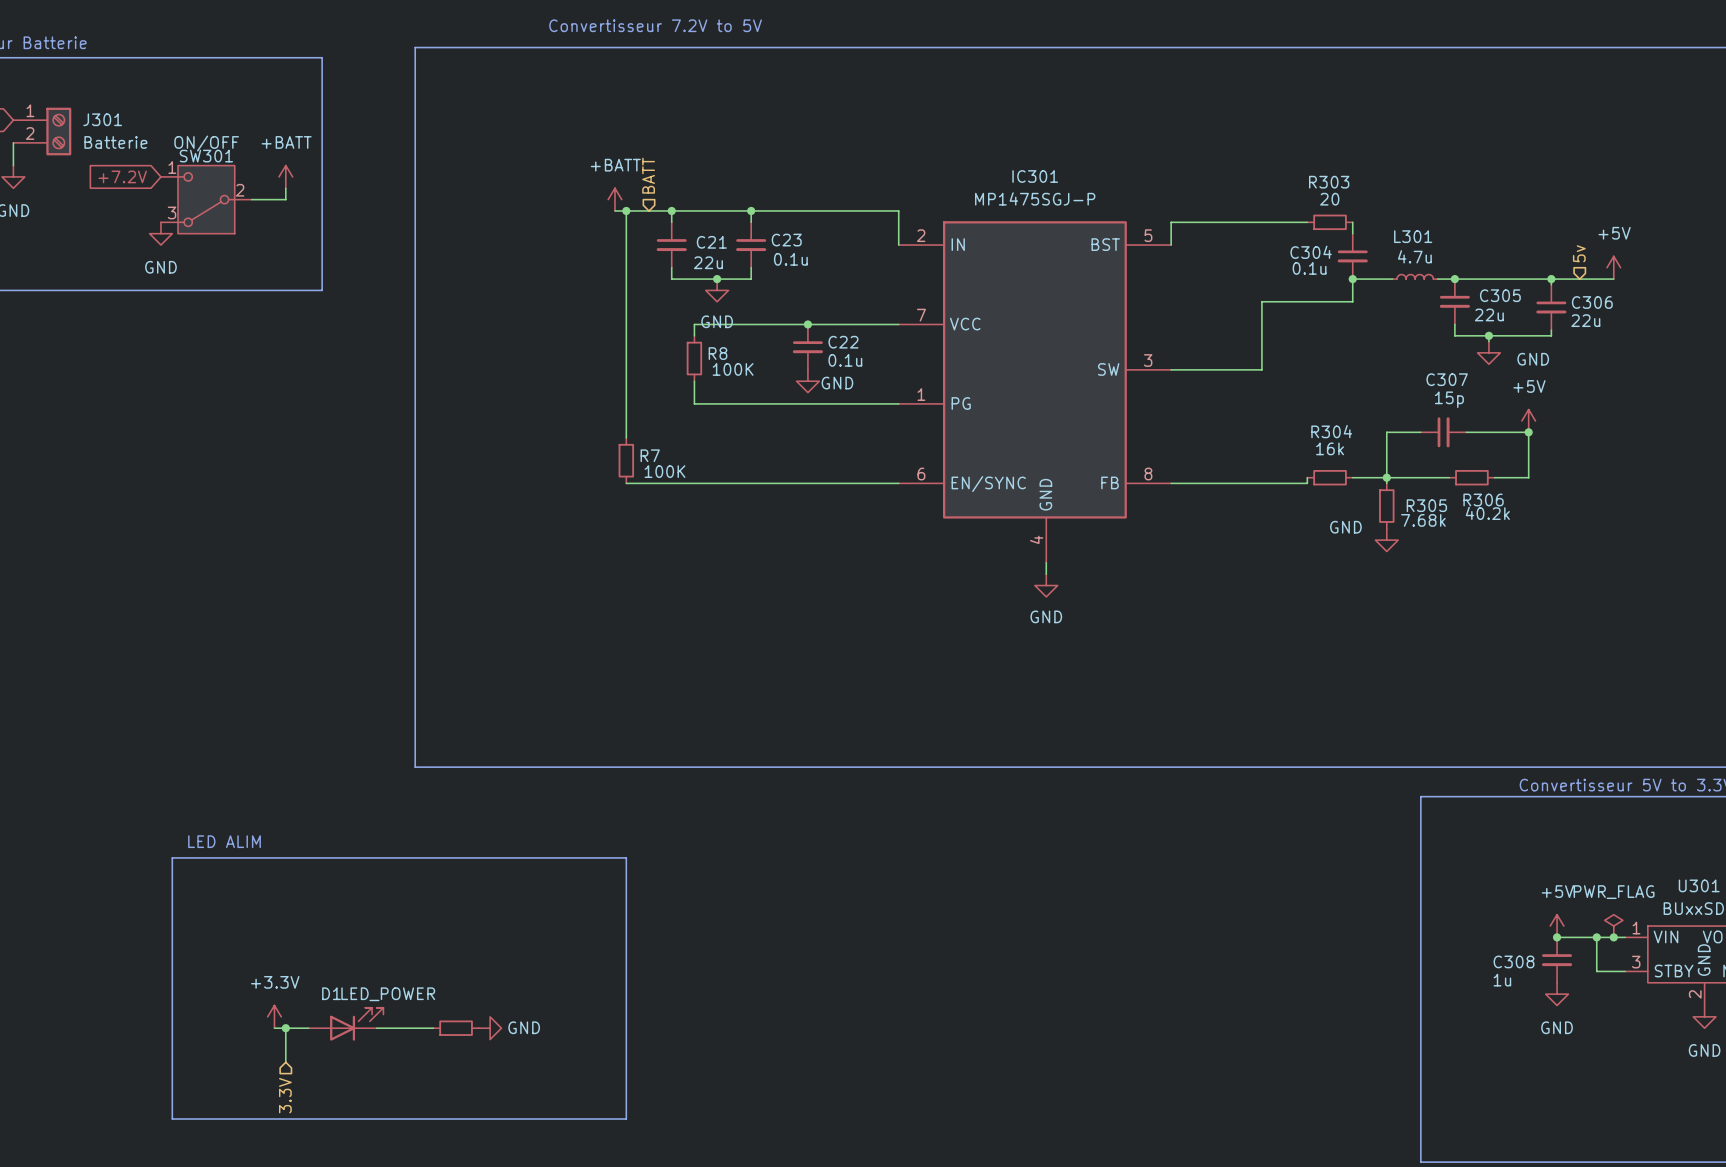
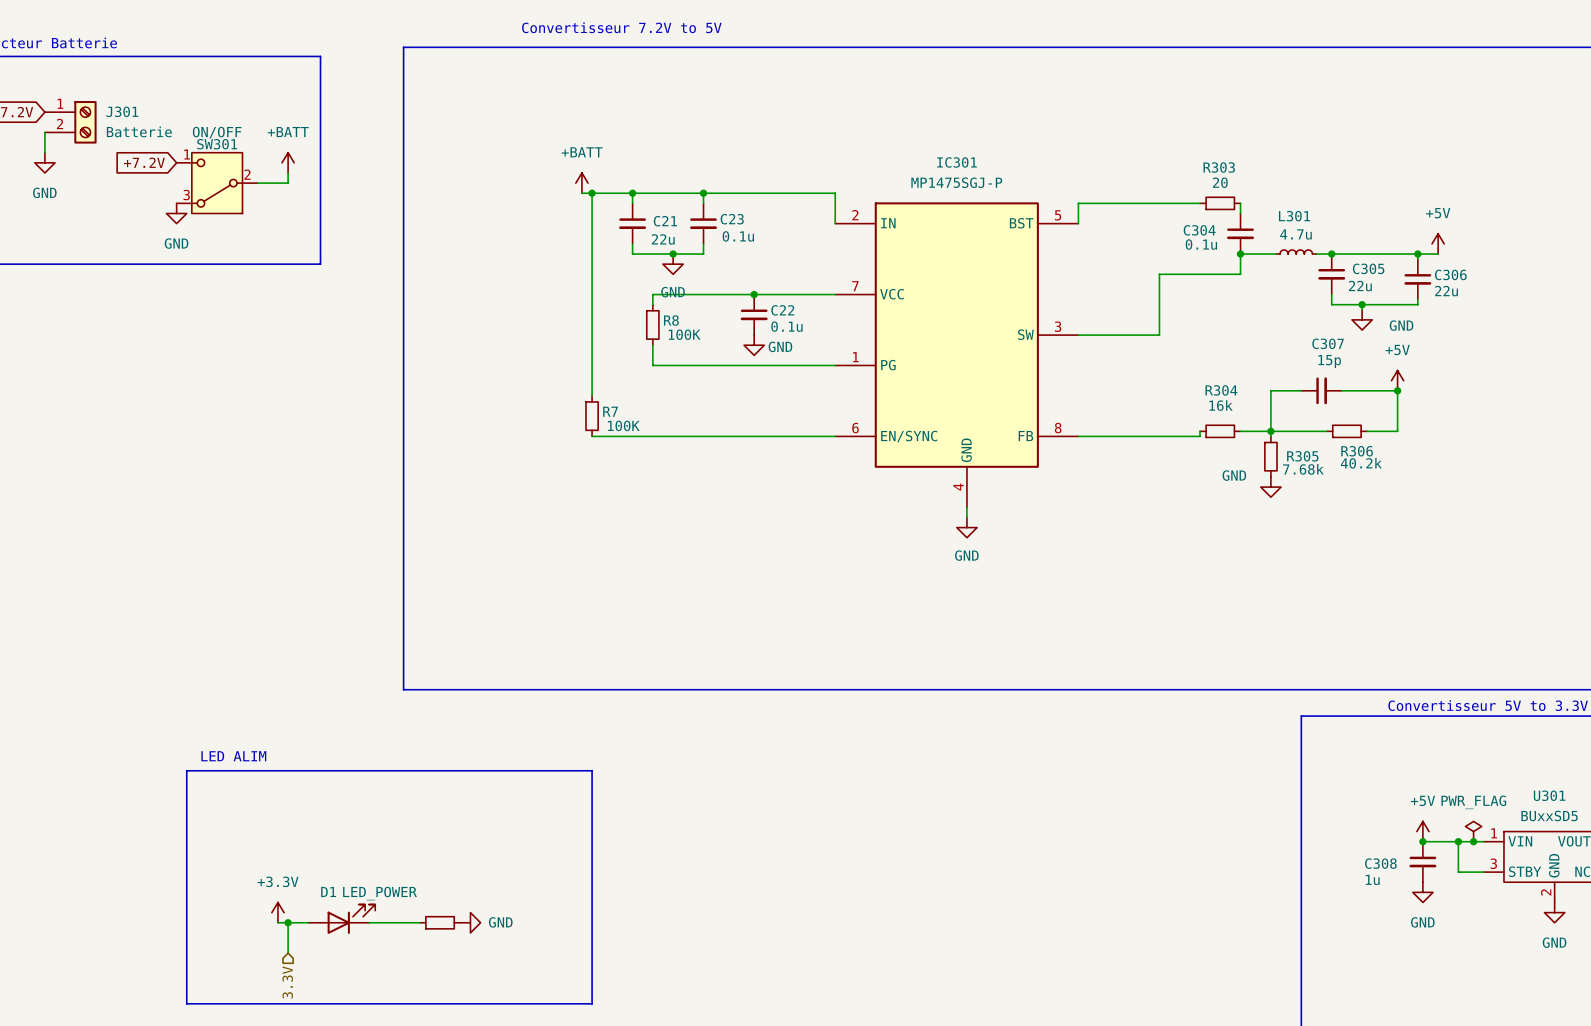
hierarchical label: BATT (648, 175) -> none
hierarchical label: 5v (1579, 253) -> none
power symbol position: +5V (1613, 267) -> +5V (1438, 243)
wire: (1574, 279) (1613, 279) -> none

